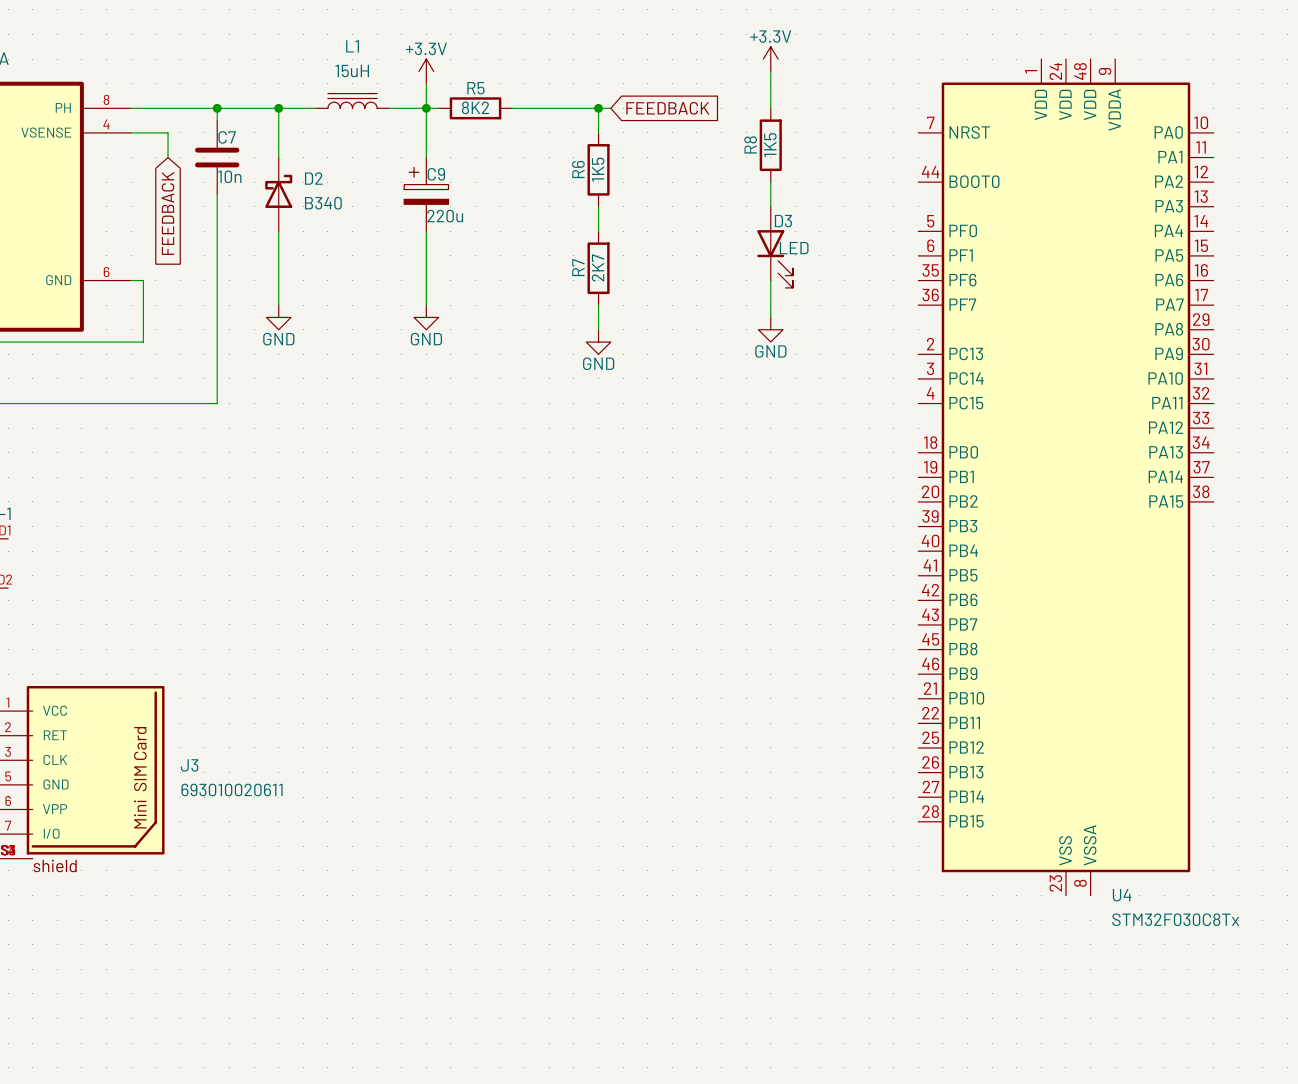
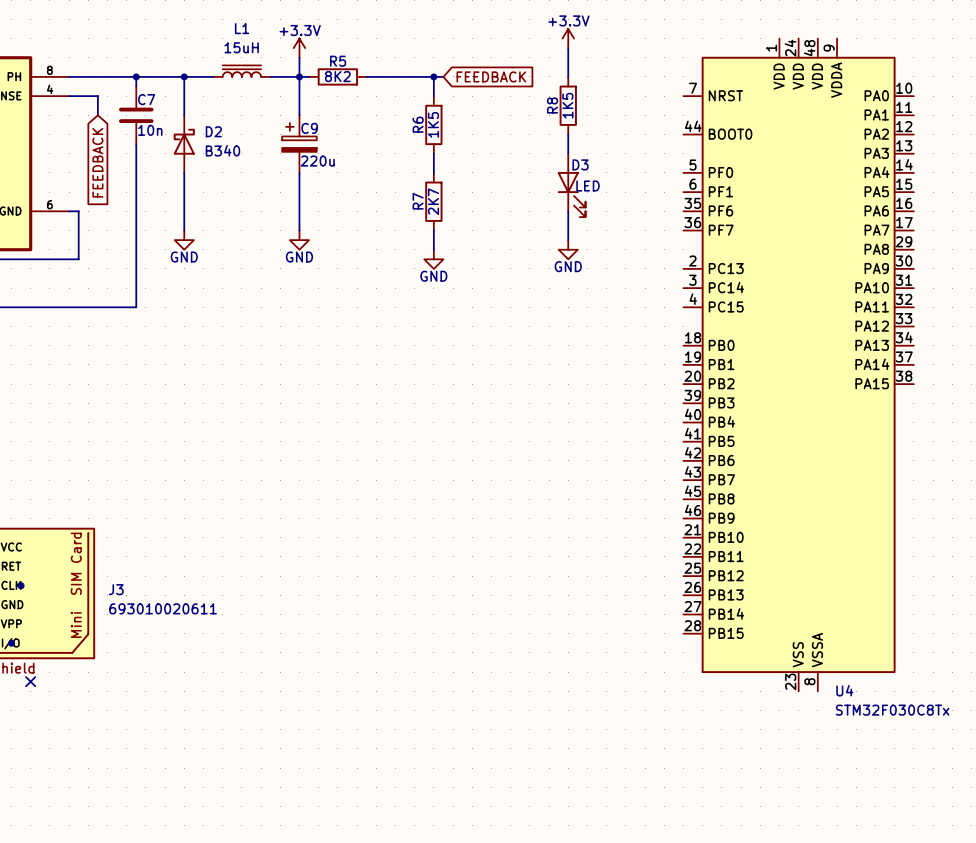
junction: none -> (21, 585)
junction: none -> (11, 643)
no-connect mark: none -> (30, 681)

